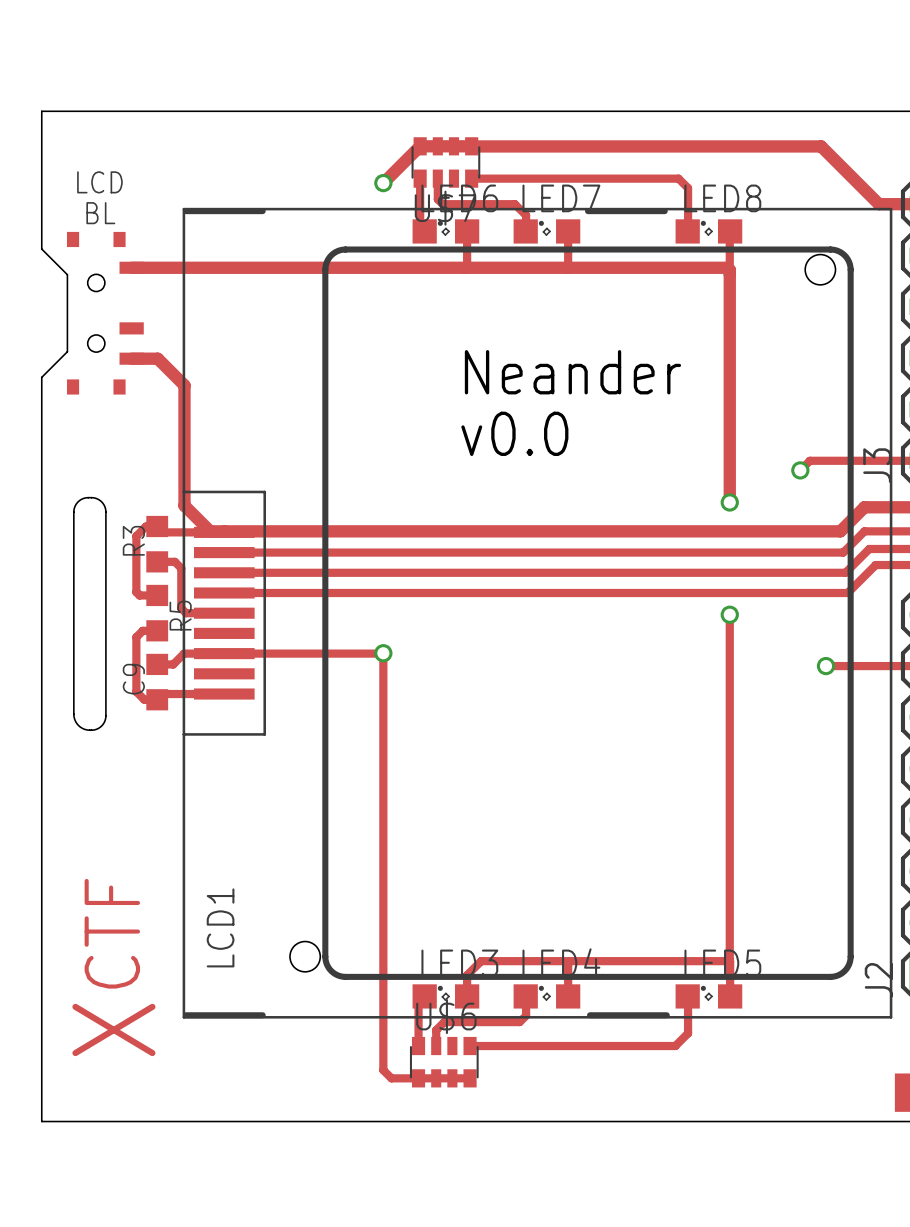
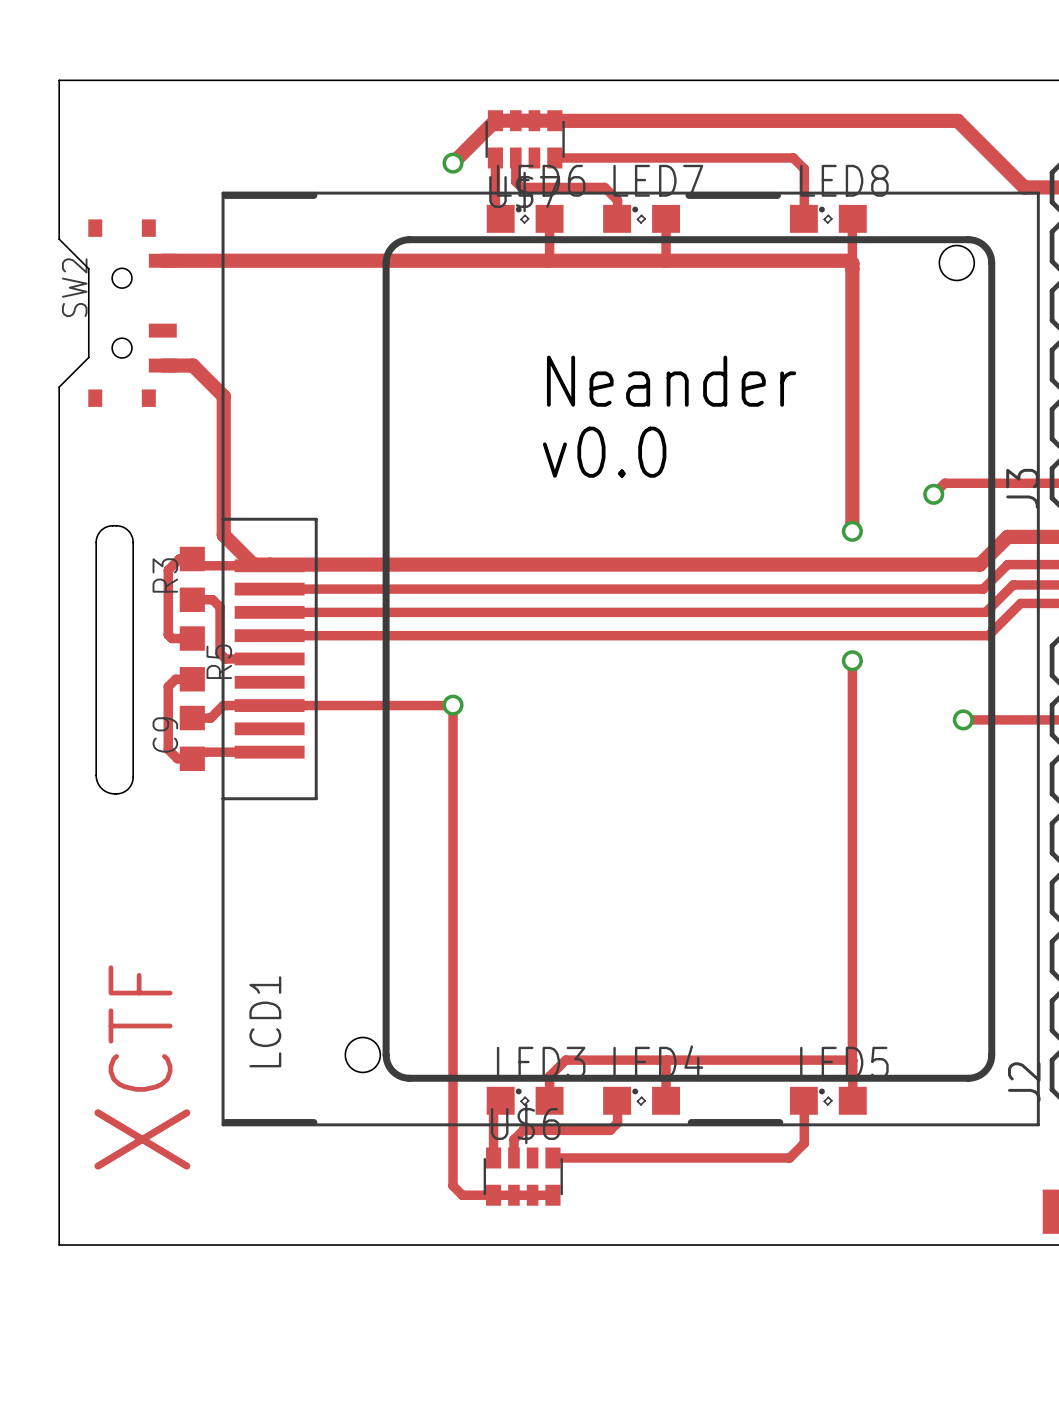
text: LCD (99, 182) -> none
text: BL (100, 213) -> none
SW2 name: none -> SW2 (74, 287)

